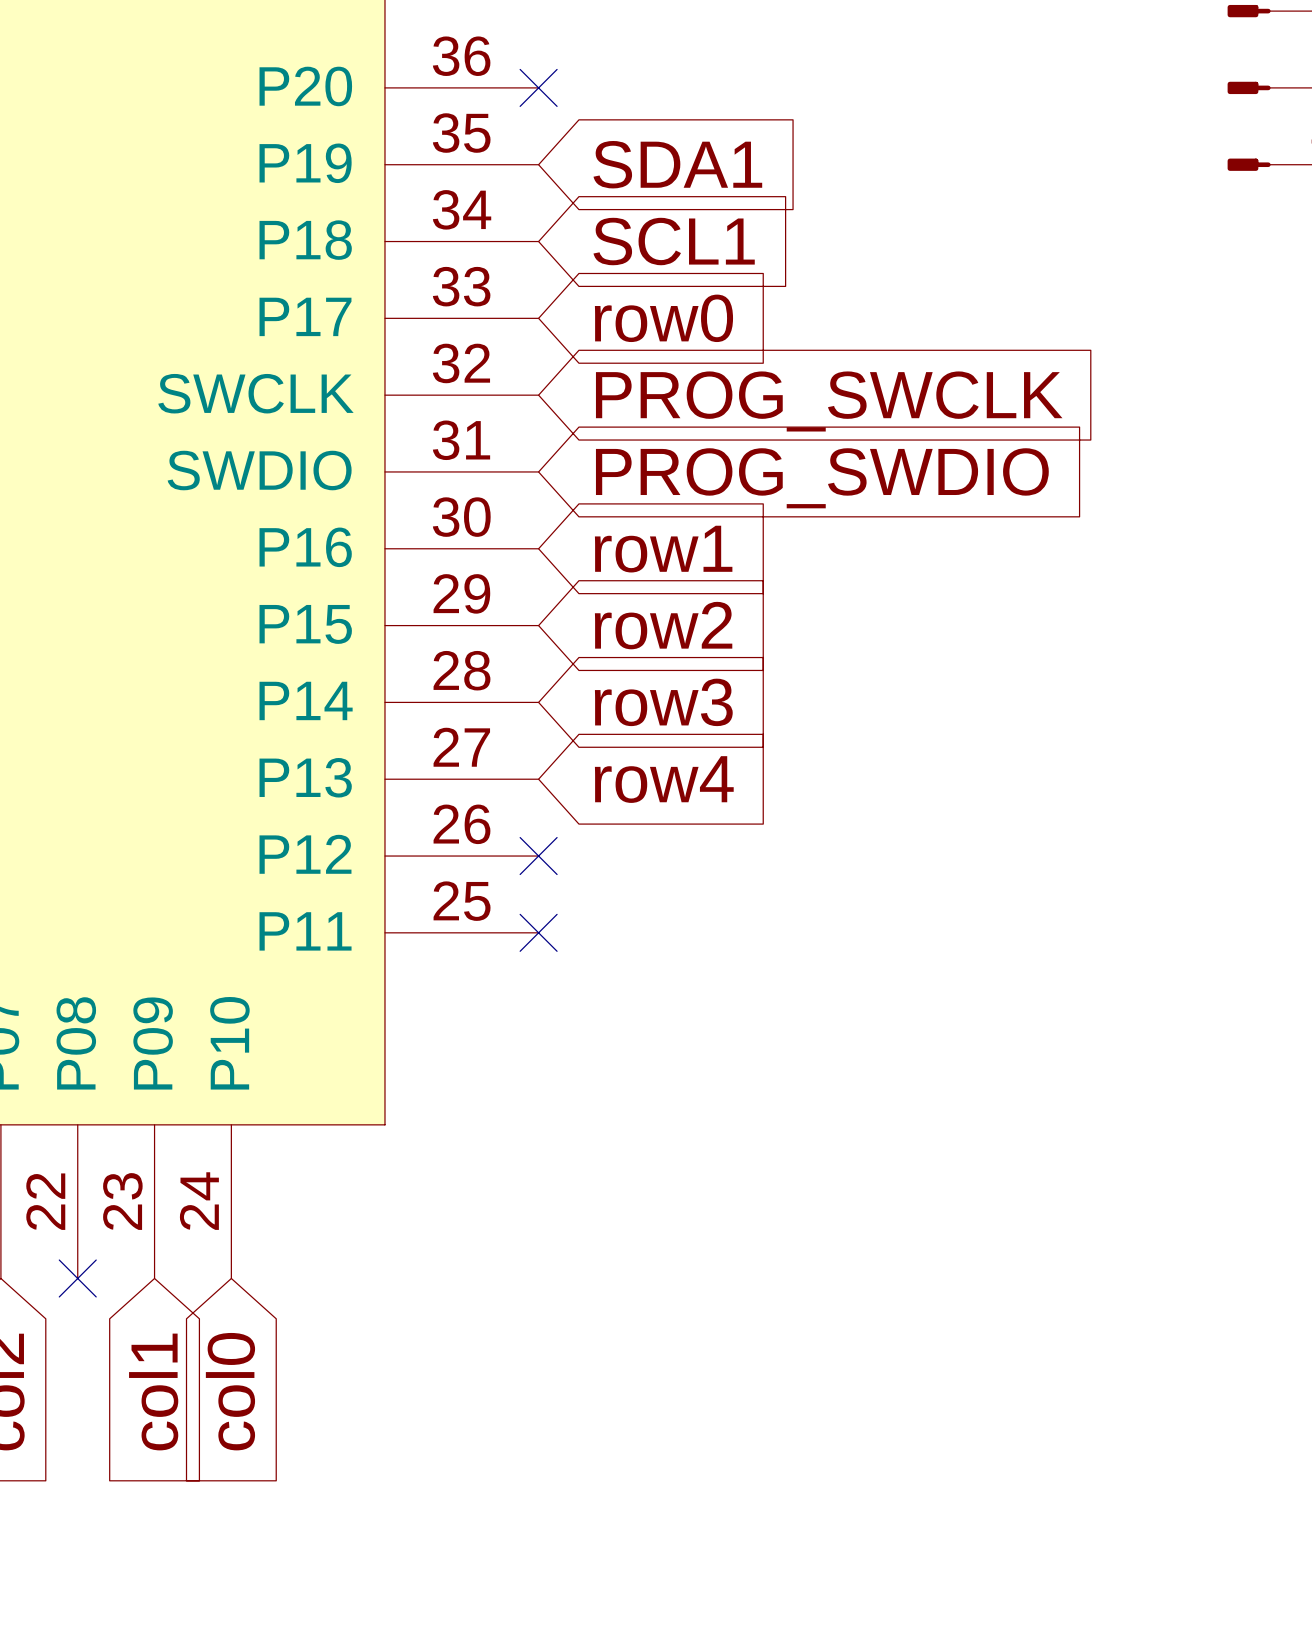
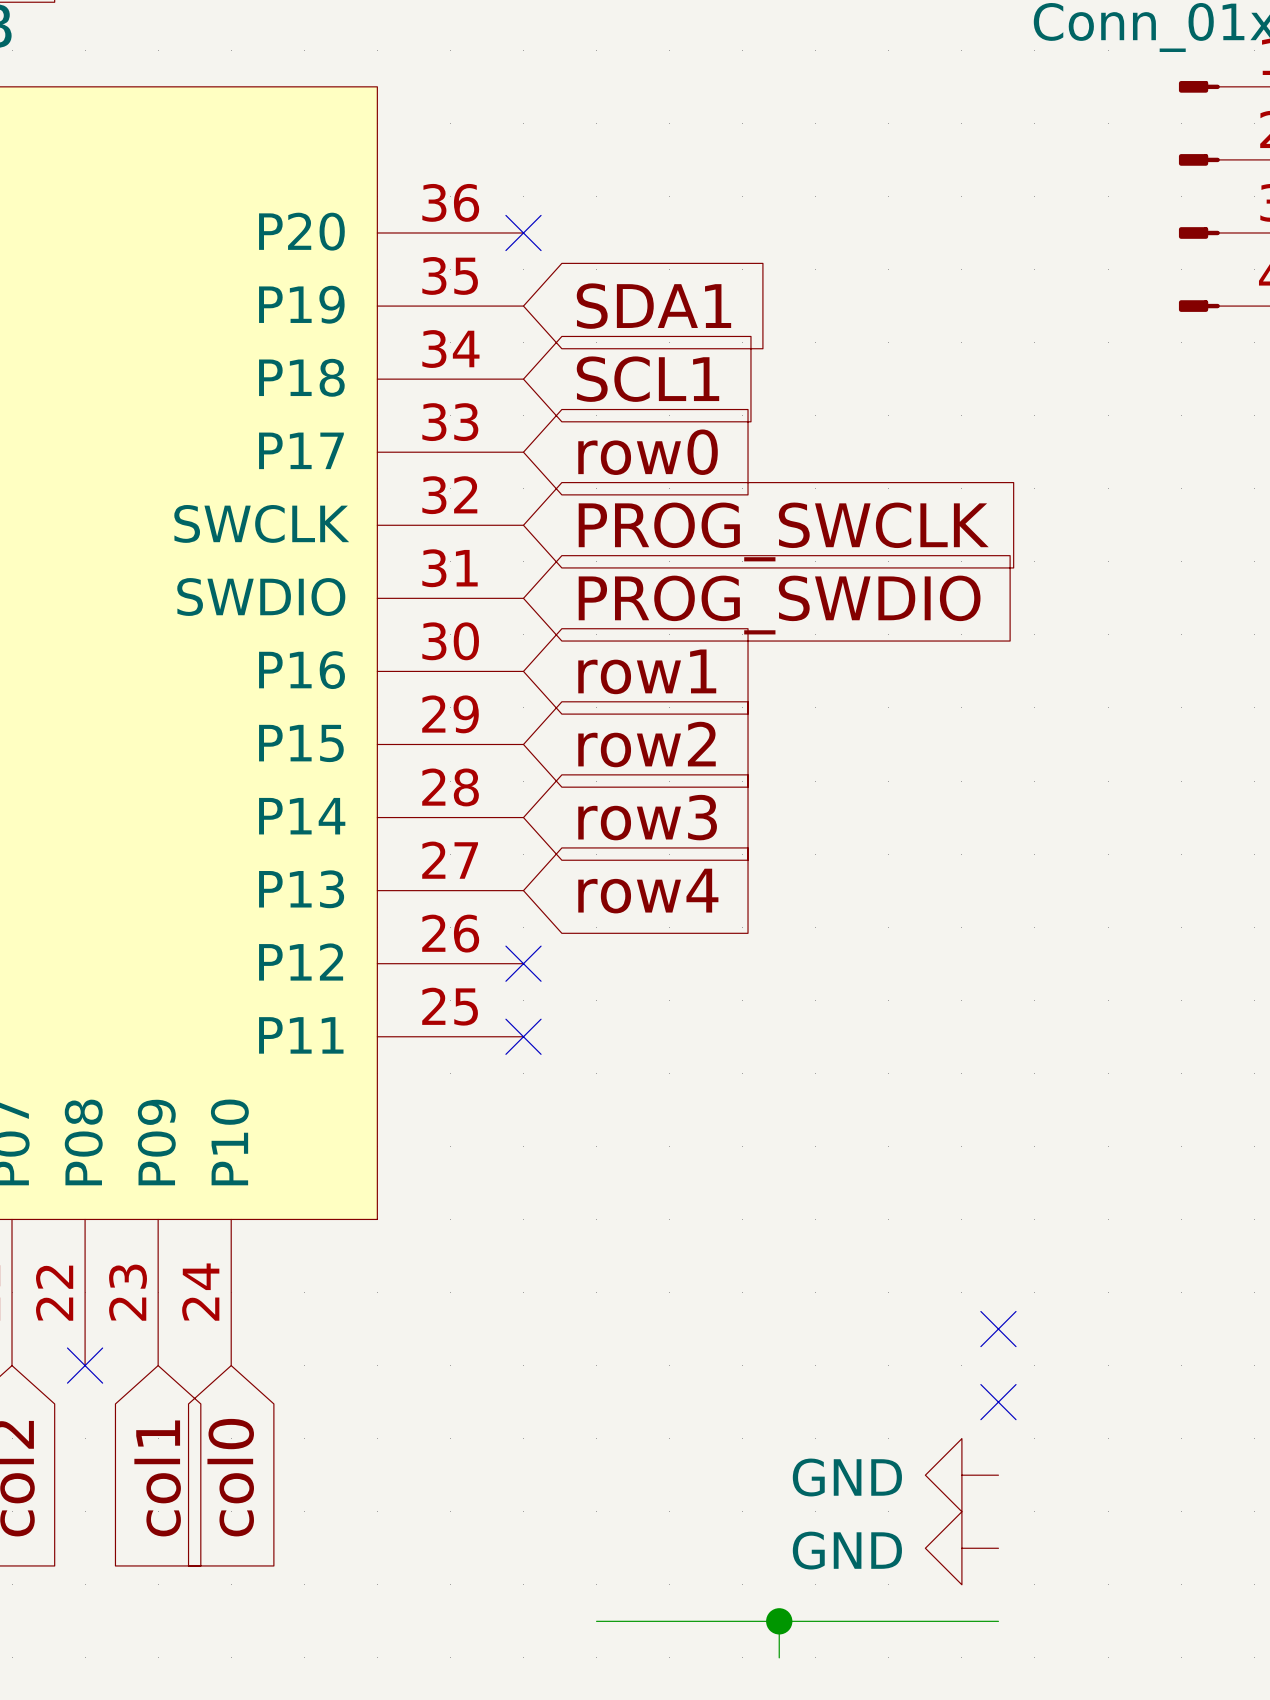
no-connect mark: none -> (998, 1329)
no-connect mark: none -> (998, 1402)
power symbol: none -> GND (961, 1475)
power symbol: none -> GND (961, 1548)
wire: none -> (596, 1621) (998, 1621)
wire: none -> (779, 1621) (779, 1657)
junction: none -> (779, 1621)

